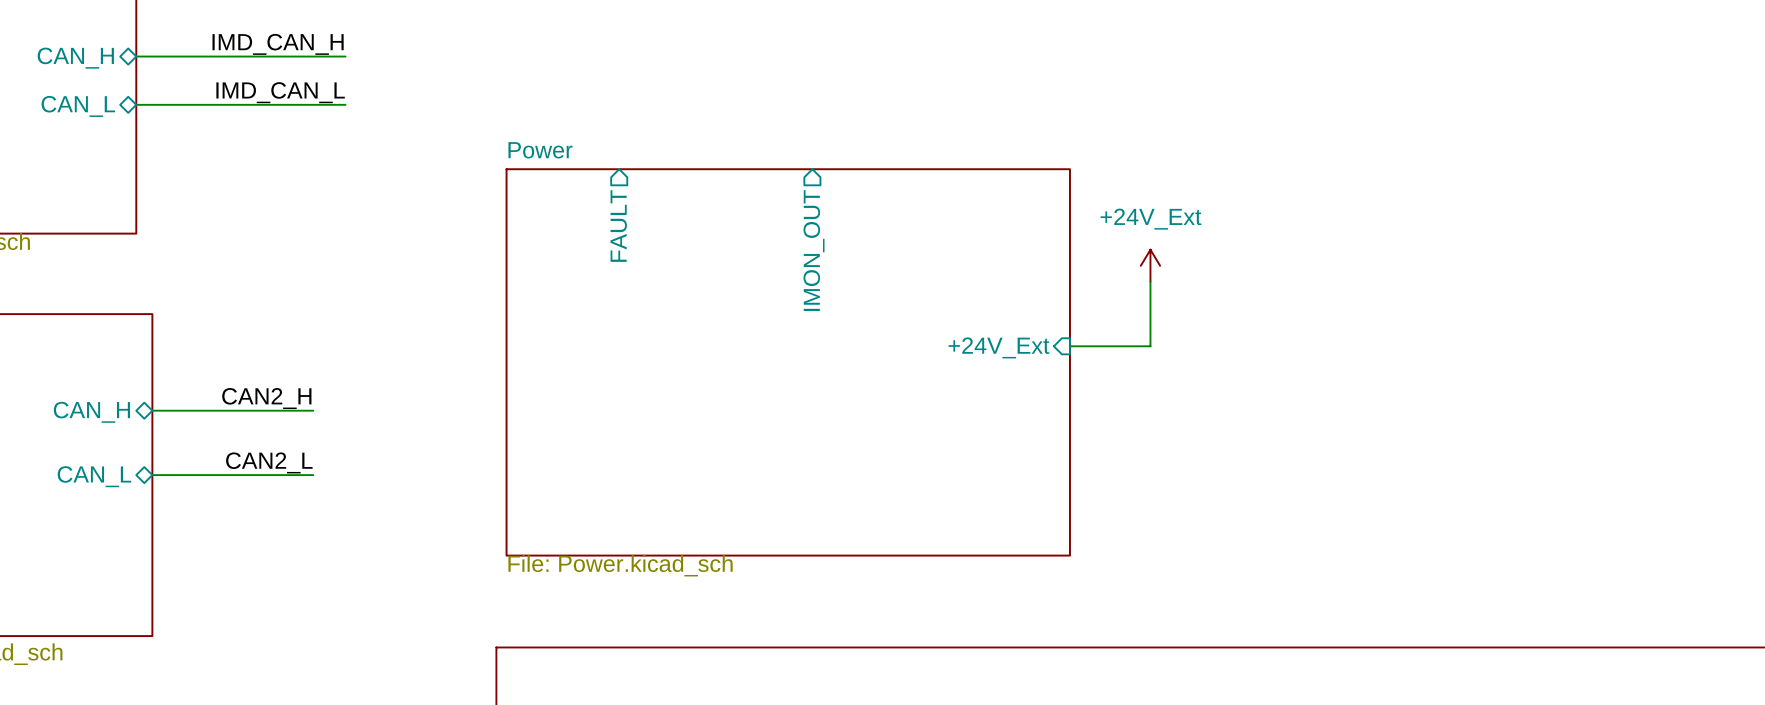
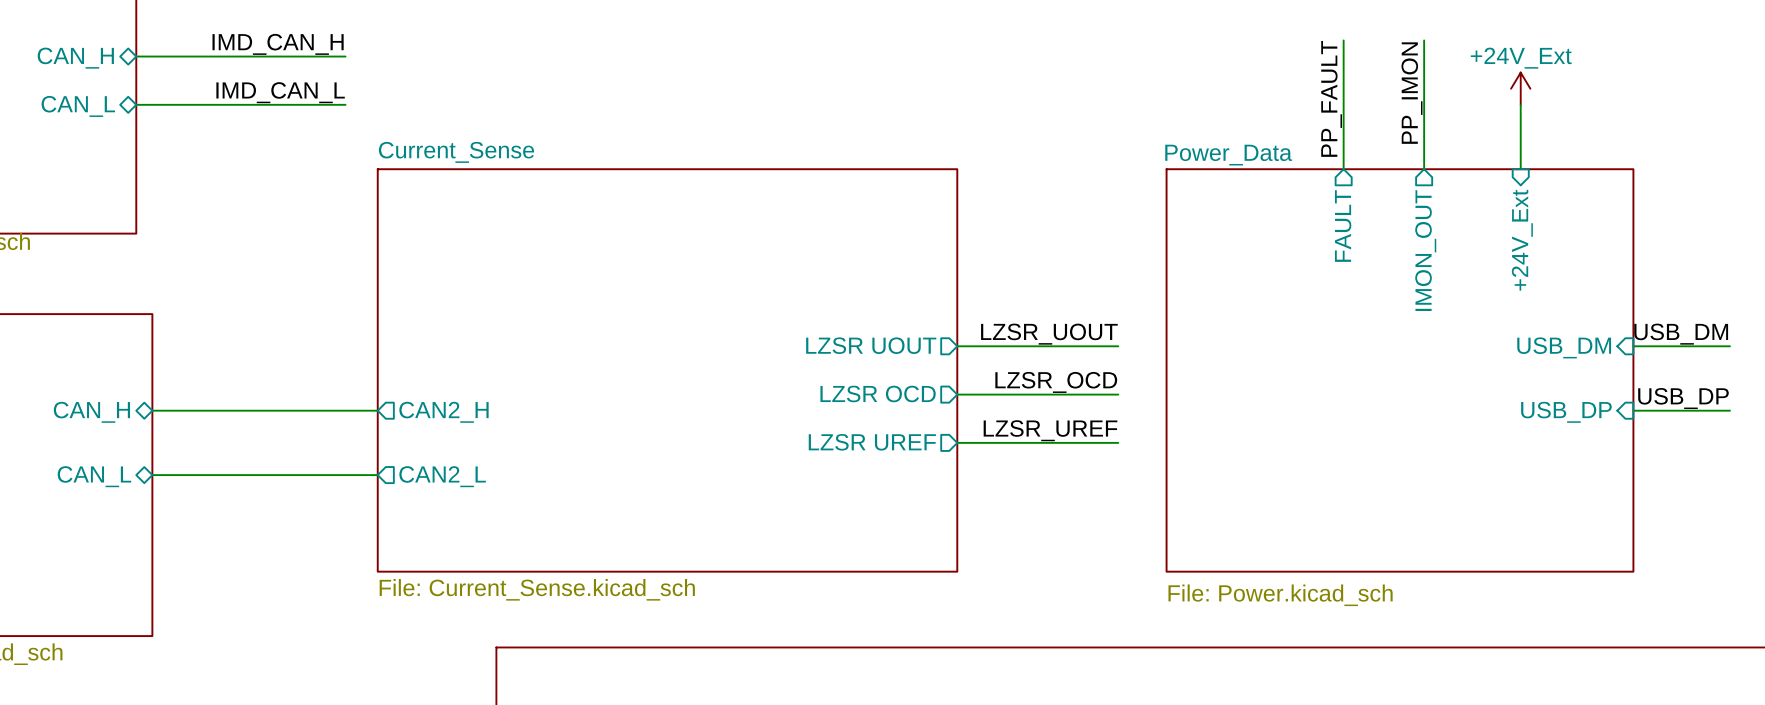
wire: none -> (1343, 40) (1343, 169)
wire: none -> (1424, 40) (1424, 169)
power symbol: none -> +24V_Ext (1520, 88)
label: none -> PP_IMON (1411, 93)
label: none -> PP_FAULT (1331, 98)
wire: none -> (1520, 104) (1520, 169)
sheet pin: FAULT (618, 226) -> none
sheet pin: none -> FAULT (1343, 226)
sheet pin: none -> +24V_Ext (1522, 240)
sheet pin: IMON_OUT (814, 250) -> none
sheet pin: none -> IMON_OUT (1425, 250)
power symbol: +24V_Ext (1150, 265) -> none
wire: (1150, 281) (1150, 346) (1118, 346) -> none
label: none -> LZSR_UOUT (1049, 334)
label: none -> USB_DM (1681, 334)
sheet pin: none -> LZSR UOUT (871, 345)
wire: none -> (957, 346) (1069, 346)
wire: none -> (1633, 346) (1730, 346)
sheet pin: +24V_Ext (998, 347) -> none
sheet pin: none -> USB_DM (1564, 347)
sheet Power: File: Power.kicad_sch (788, 362) -> none
sheet Current_Sense: none -> File: Current_Sense.kicad_sch (667, 370)
sheet Power_Data: none -> File: Power.kicad_sch (1399, 370)
label: none -> LZSR_OCD (1056, 382)
sheet pin: none -> LZSR OCD (878, 393)
wire: none -> (957, 394) (1118, 394)
label: CAN2_H (266, 398) -> none
label: none -> USB_DP (1683, 398)
wire: none -> (313, 410) (377, 410)
wire: none -> (1633, 410) (1730, 410)
sheet pin: none -> CAN2_H (444, 412)
sheet pin: none -> USB_DP (1566, 412)
label: none -> LZSR_UREF (1050, 430)
sheet pin: none -> LZSR UREF (872, 442)
wire: none -> (957, 442) (1118, 442)
label: CAN2_L (269, 462) -> none
wire: none -> (313, 475) (377, 475)
sheet pin: none -> CAN2_L (442, 476)

